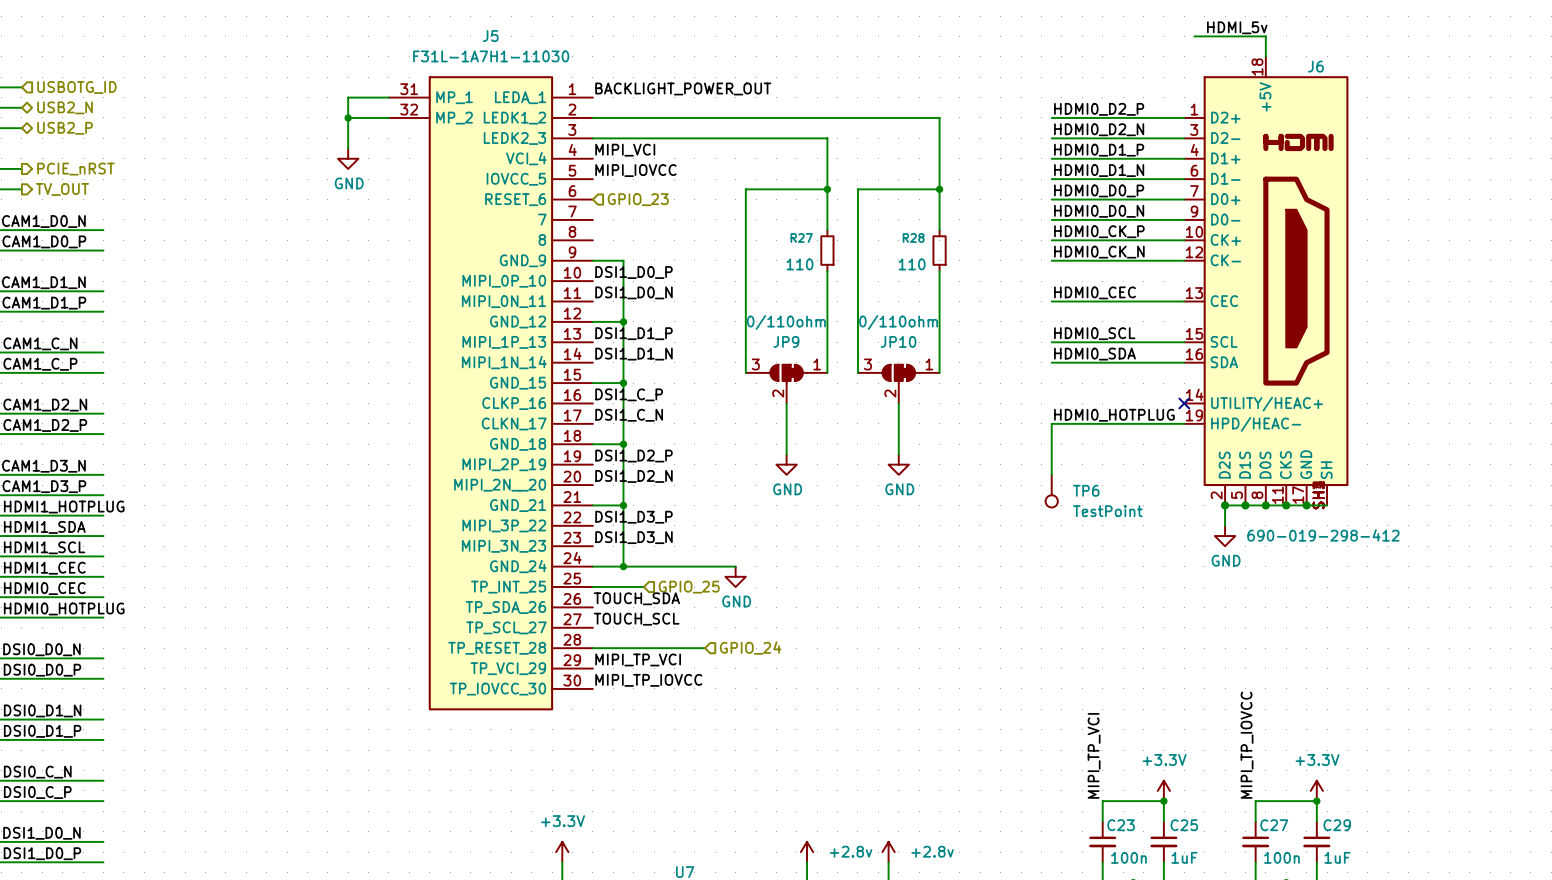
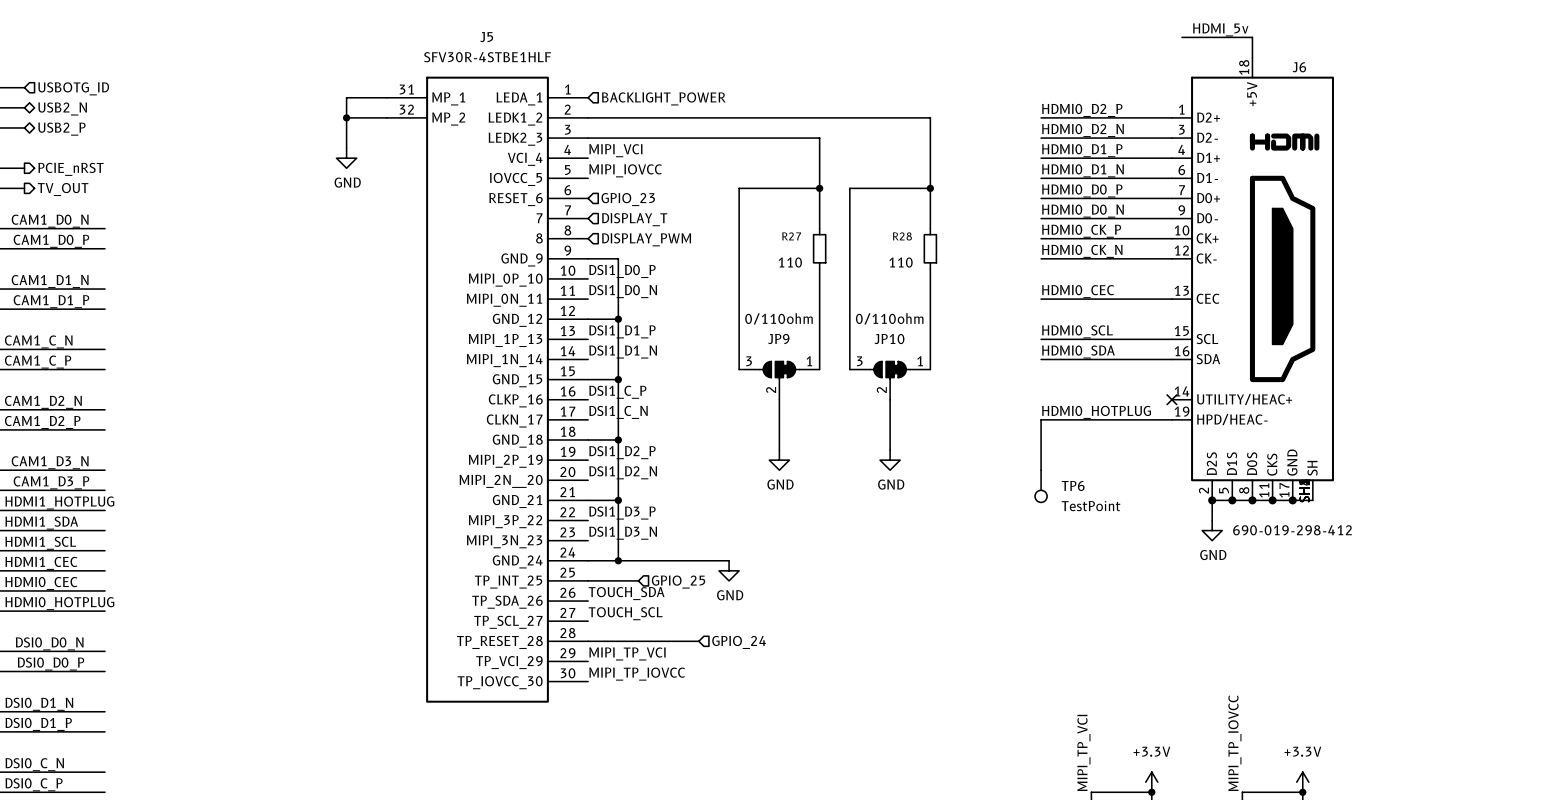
J5 value: F31L-1A7H1-11030 (491, 56) -> SFV30R-4STBE1HLF (487, 57)
label: BACKLIGHT_POWER_OUT (683, 88) -> none
hierarchical label: none -> BACKLIGHT_POWER (663, 98)
hierarchical label: none -> DISPLAY_T (634, 219)
hierarchical label: none -> DISPLAY_PWM (646, 239)

